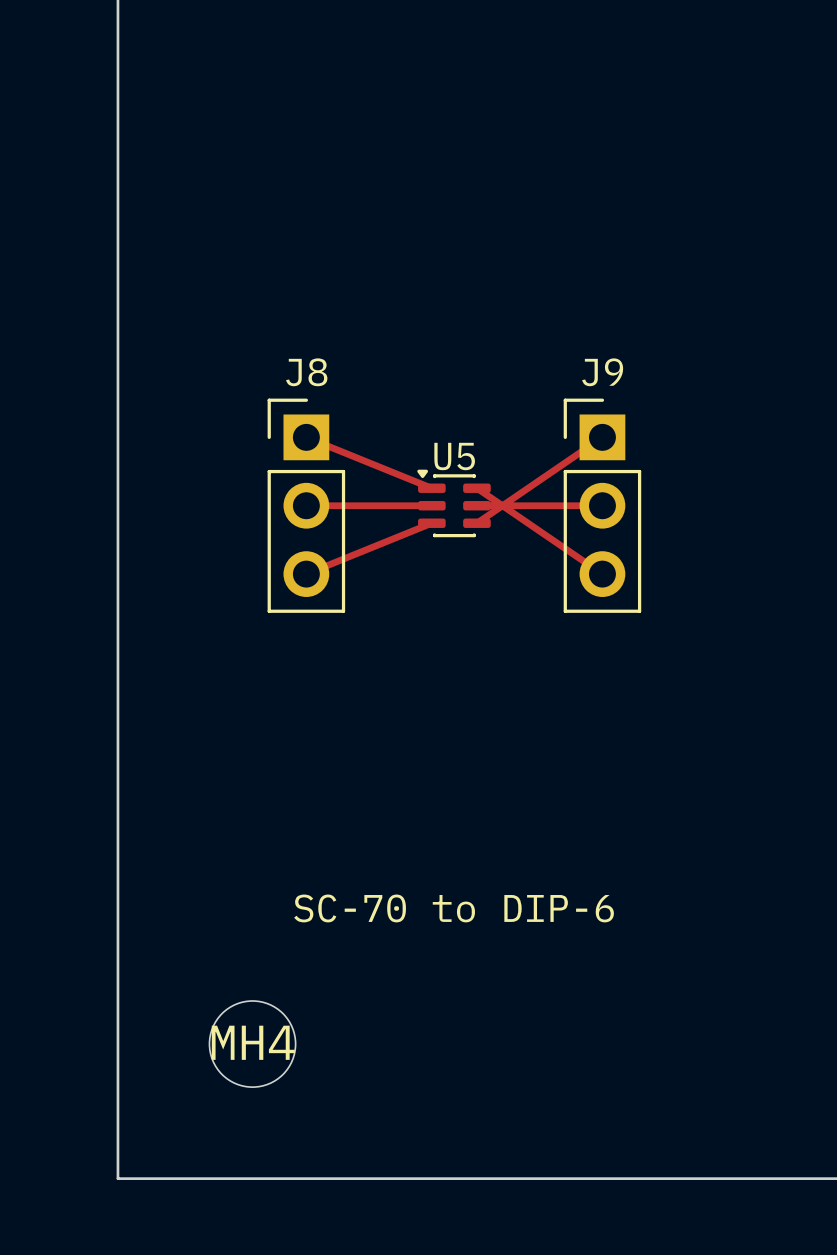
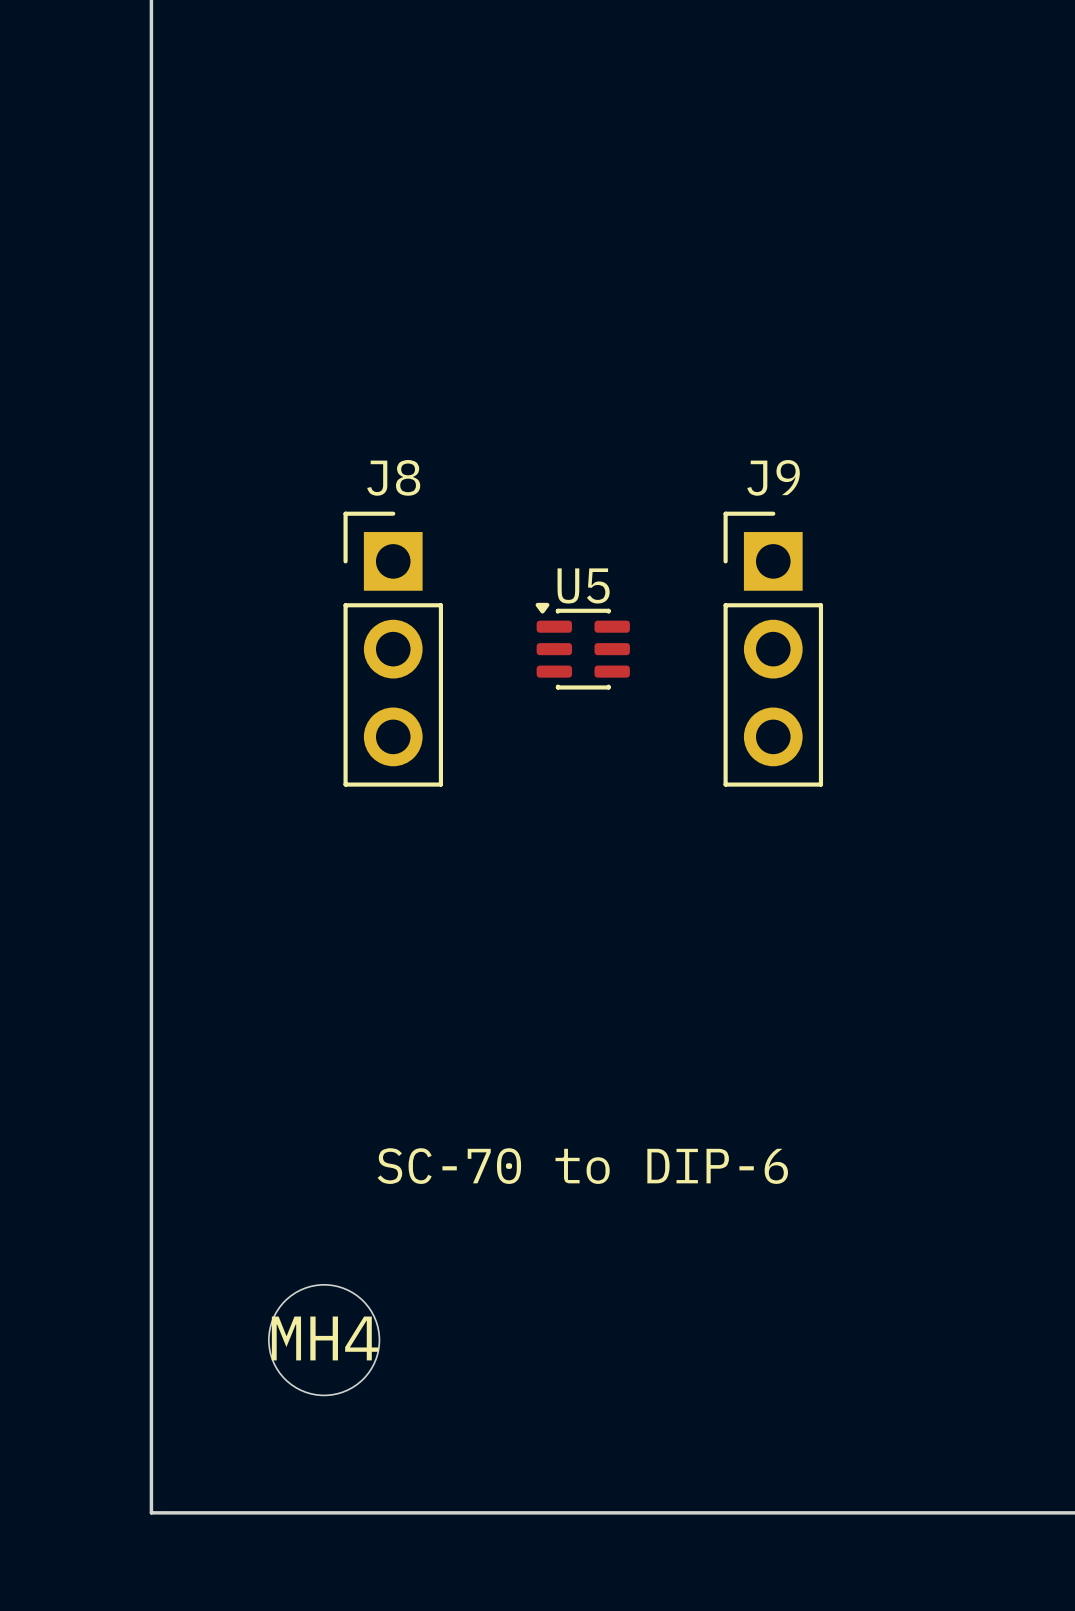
track: (306, 437) (431, 488) -> none
track: (602, 437) (476, 523) -> none
track: (476, 488) (602, 574) -> none
track: (306, 505) (431, 505) -> none
track: (476, 505) (602, 505) -> none
track: (431, 523) (306, 574) -> none

